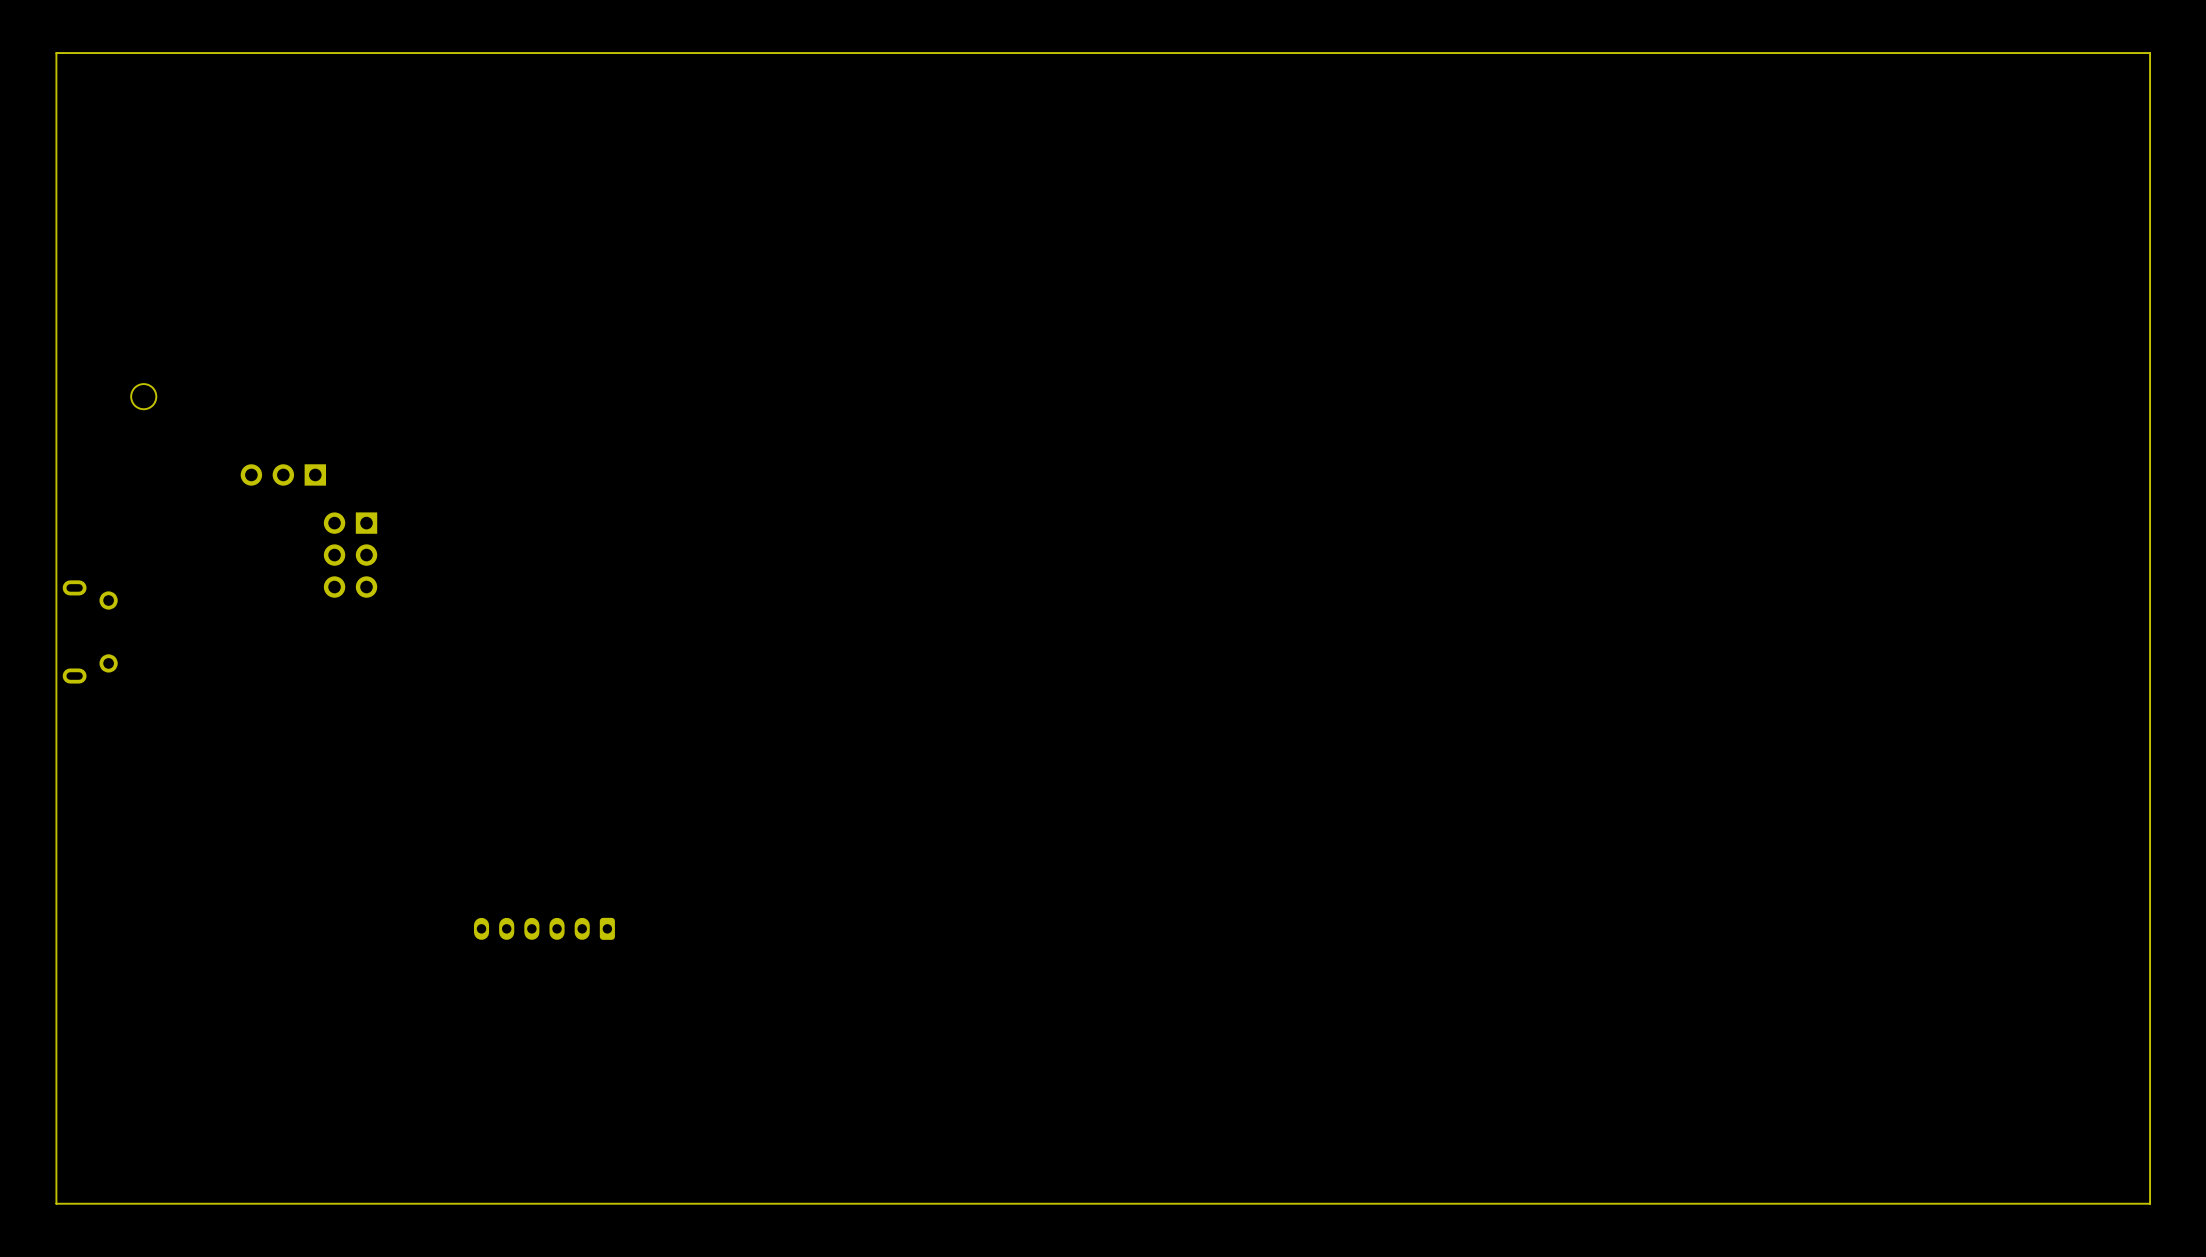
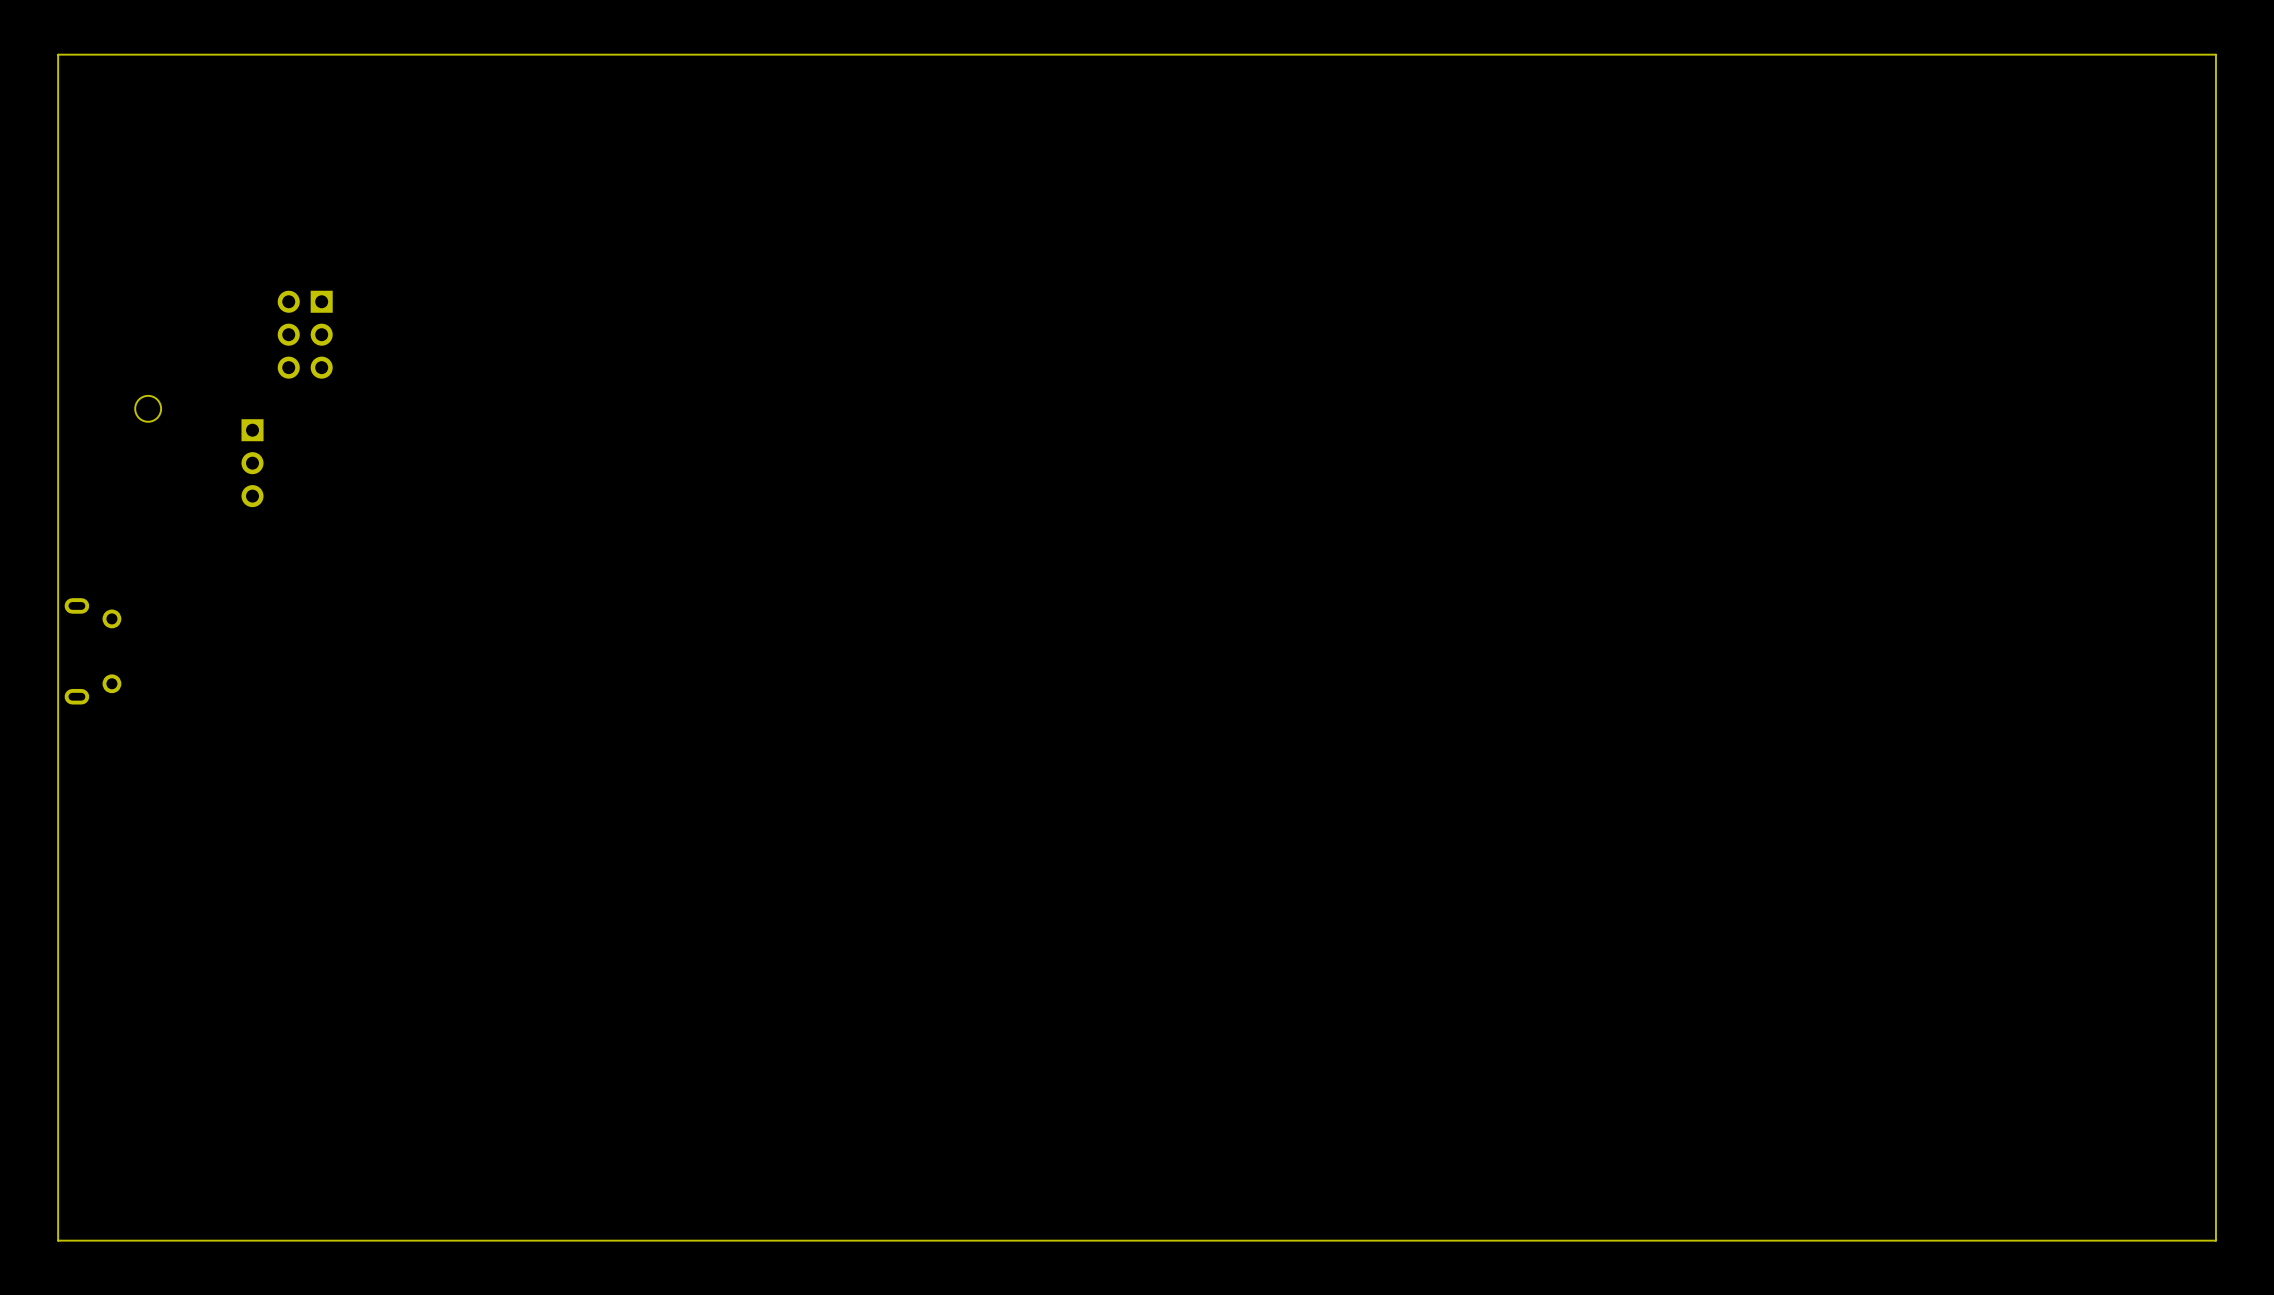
part rotation: 0° (283, 474) -> 90° counterclockwise (252, 463)
part position: (350, 555) -> (305, 334)
part: (544, 928) -> none

